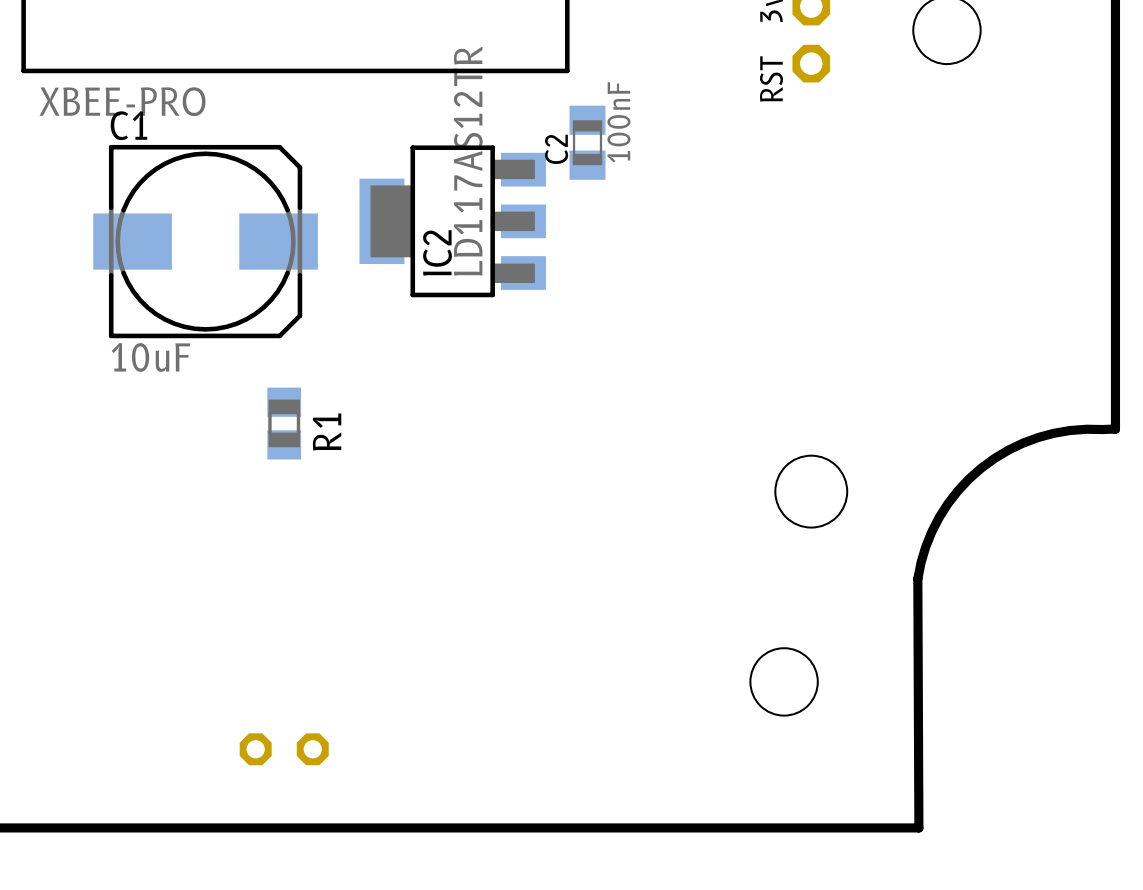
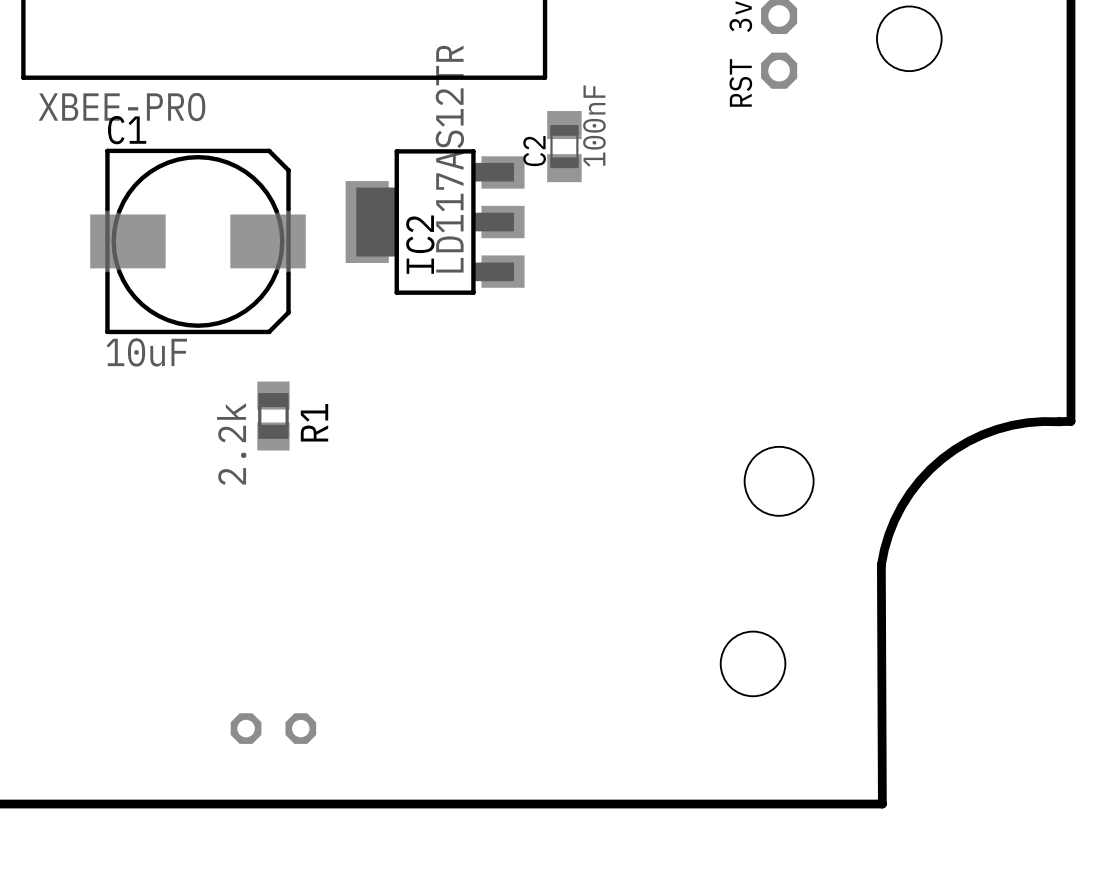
R1 value: none -> 2.2k (231, 444)

